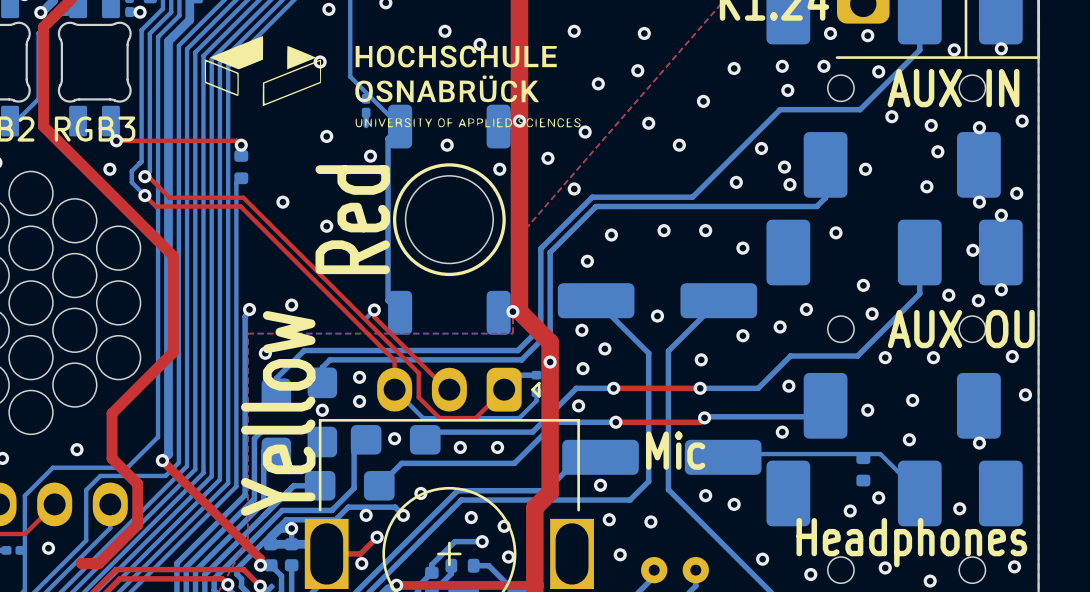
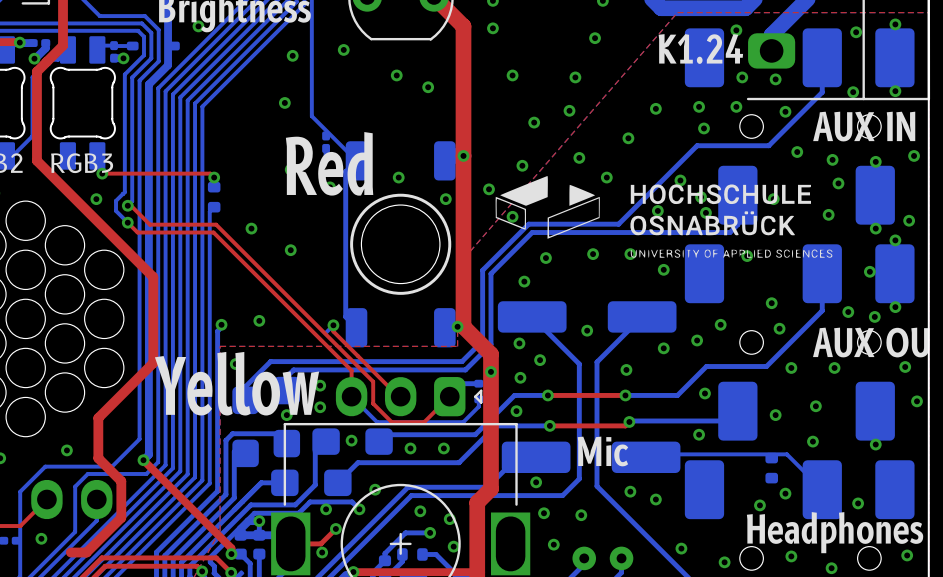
drawing position: (392, 81) -> (664, 216)
text rotation: 0° (352, 219) -> 90° clockwise (329, 163)
text rotation: 0° (278, 413) -> 90° clockwise (237, 383)

